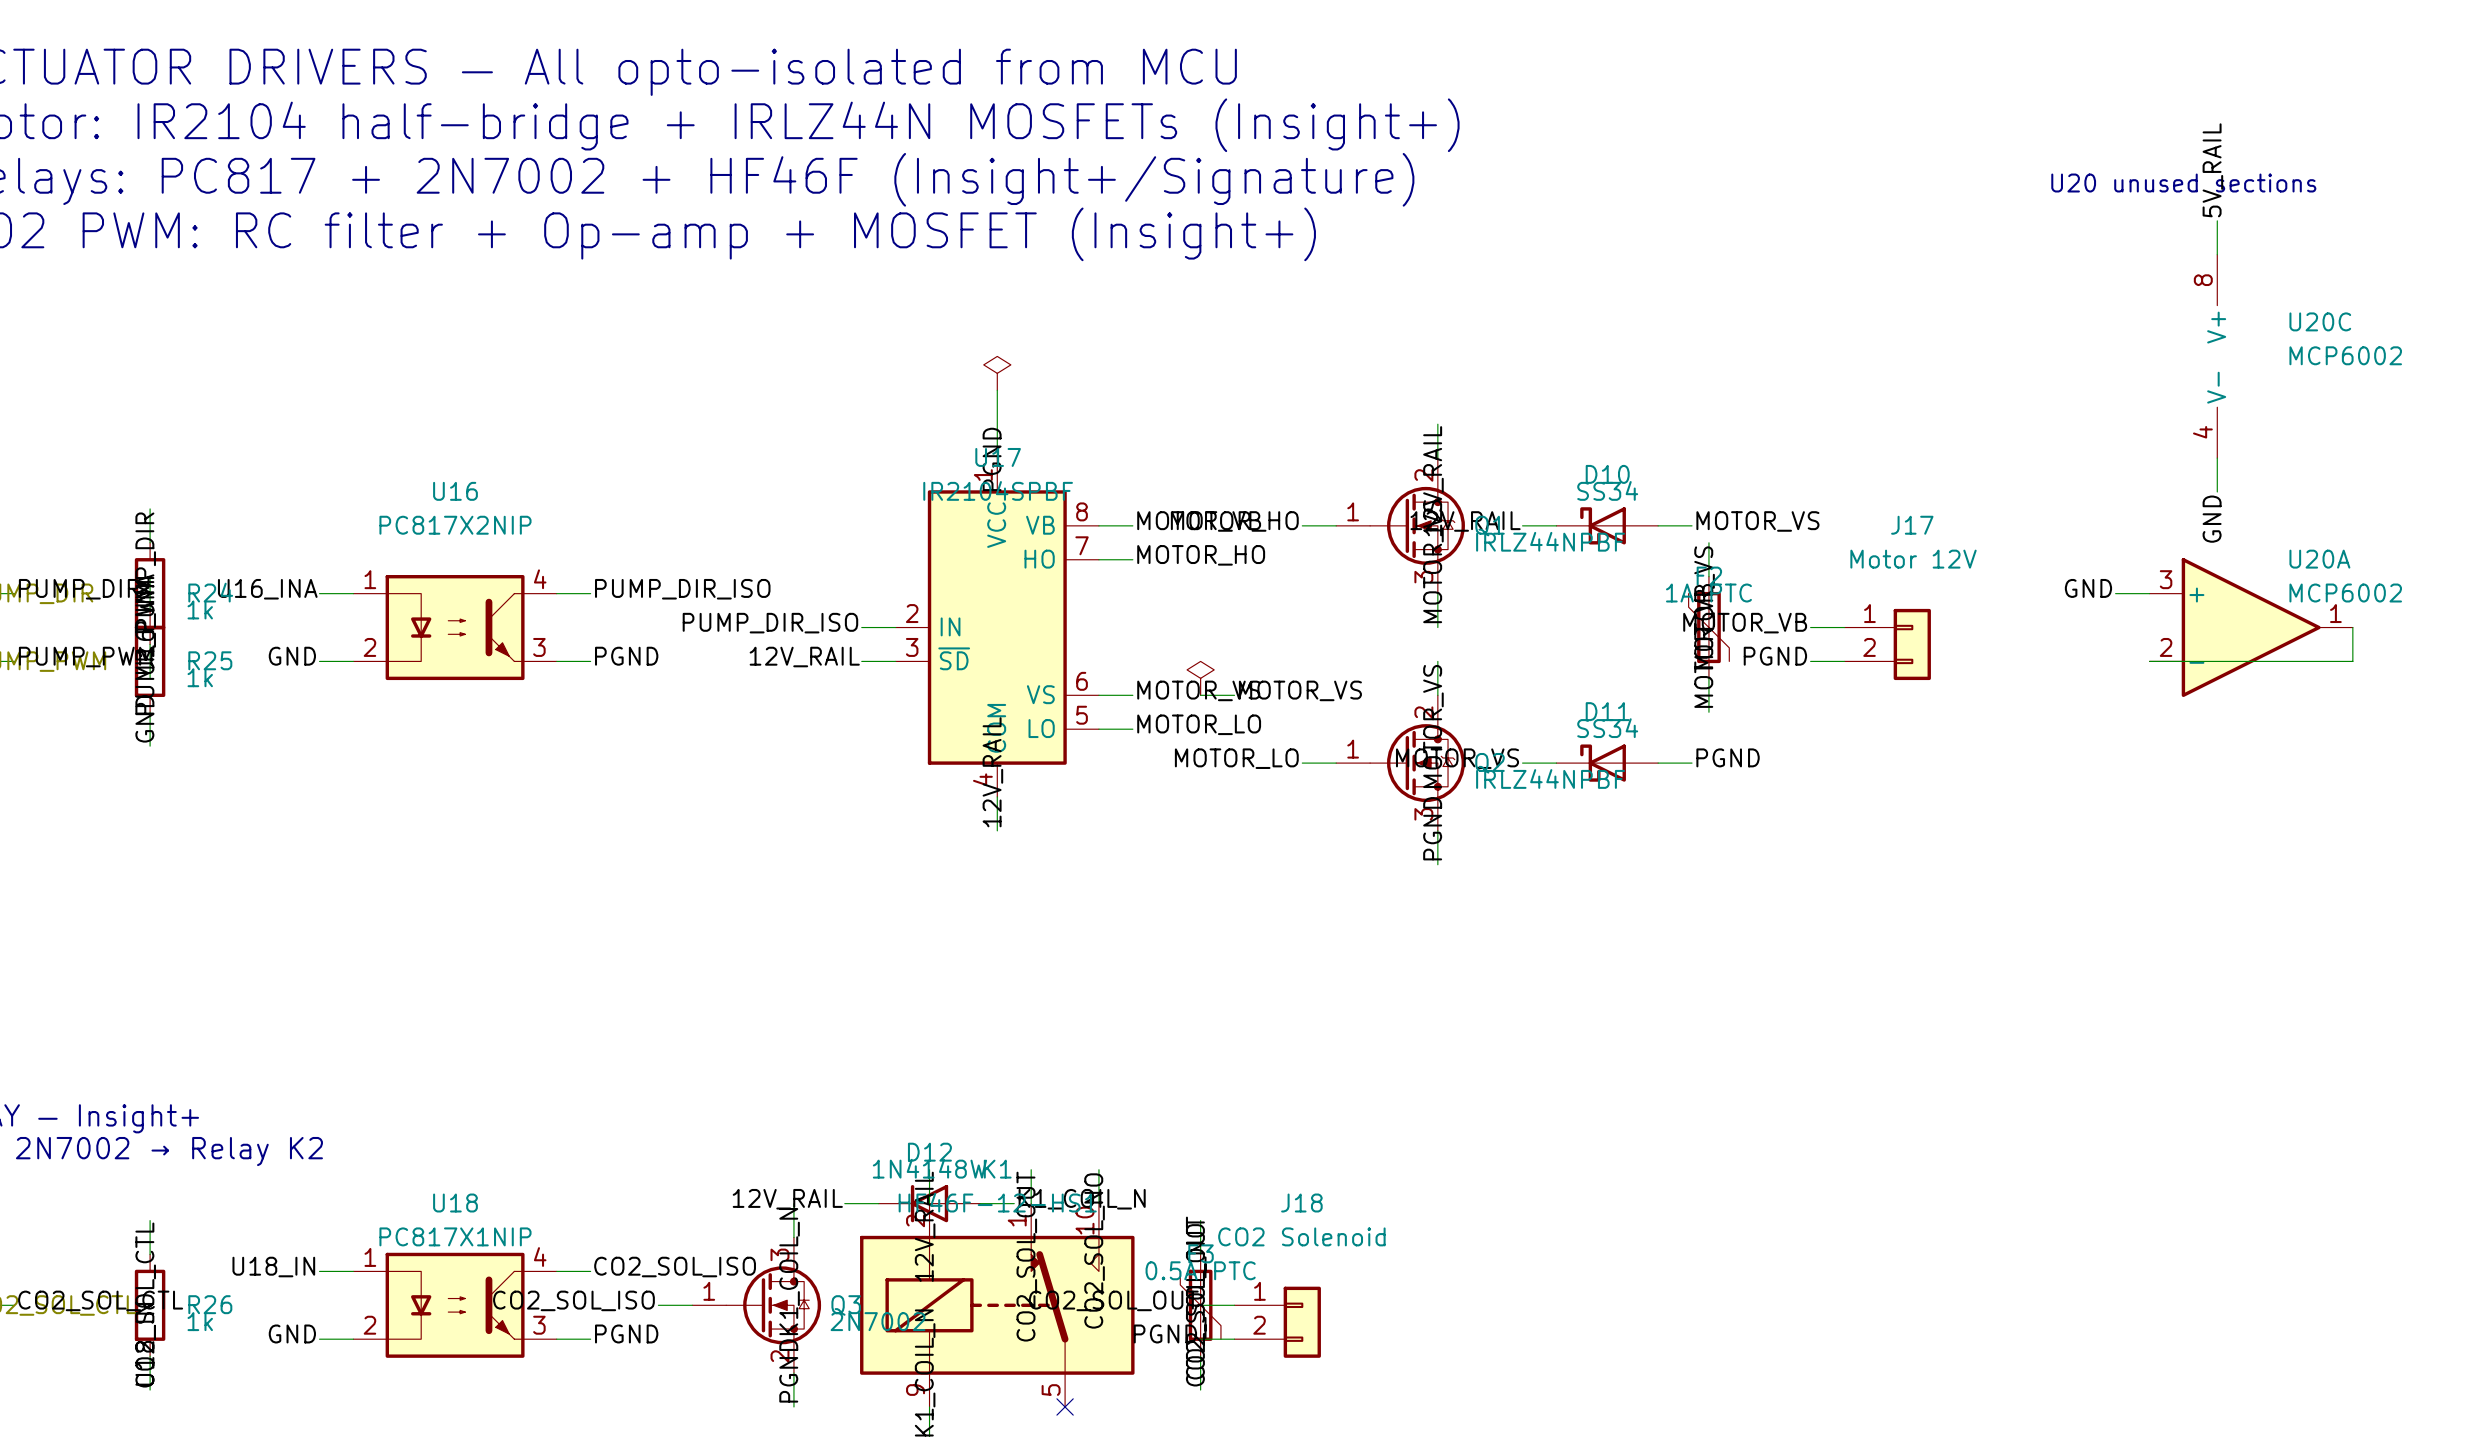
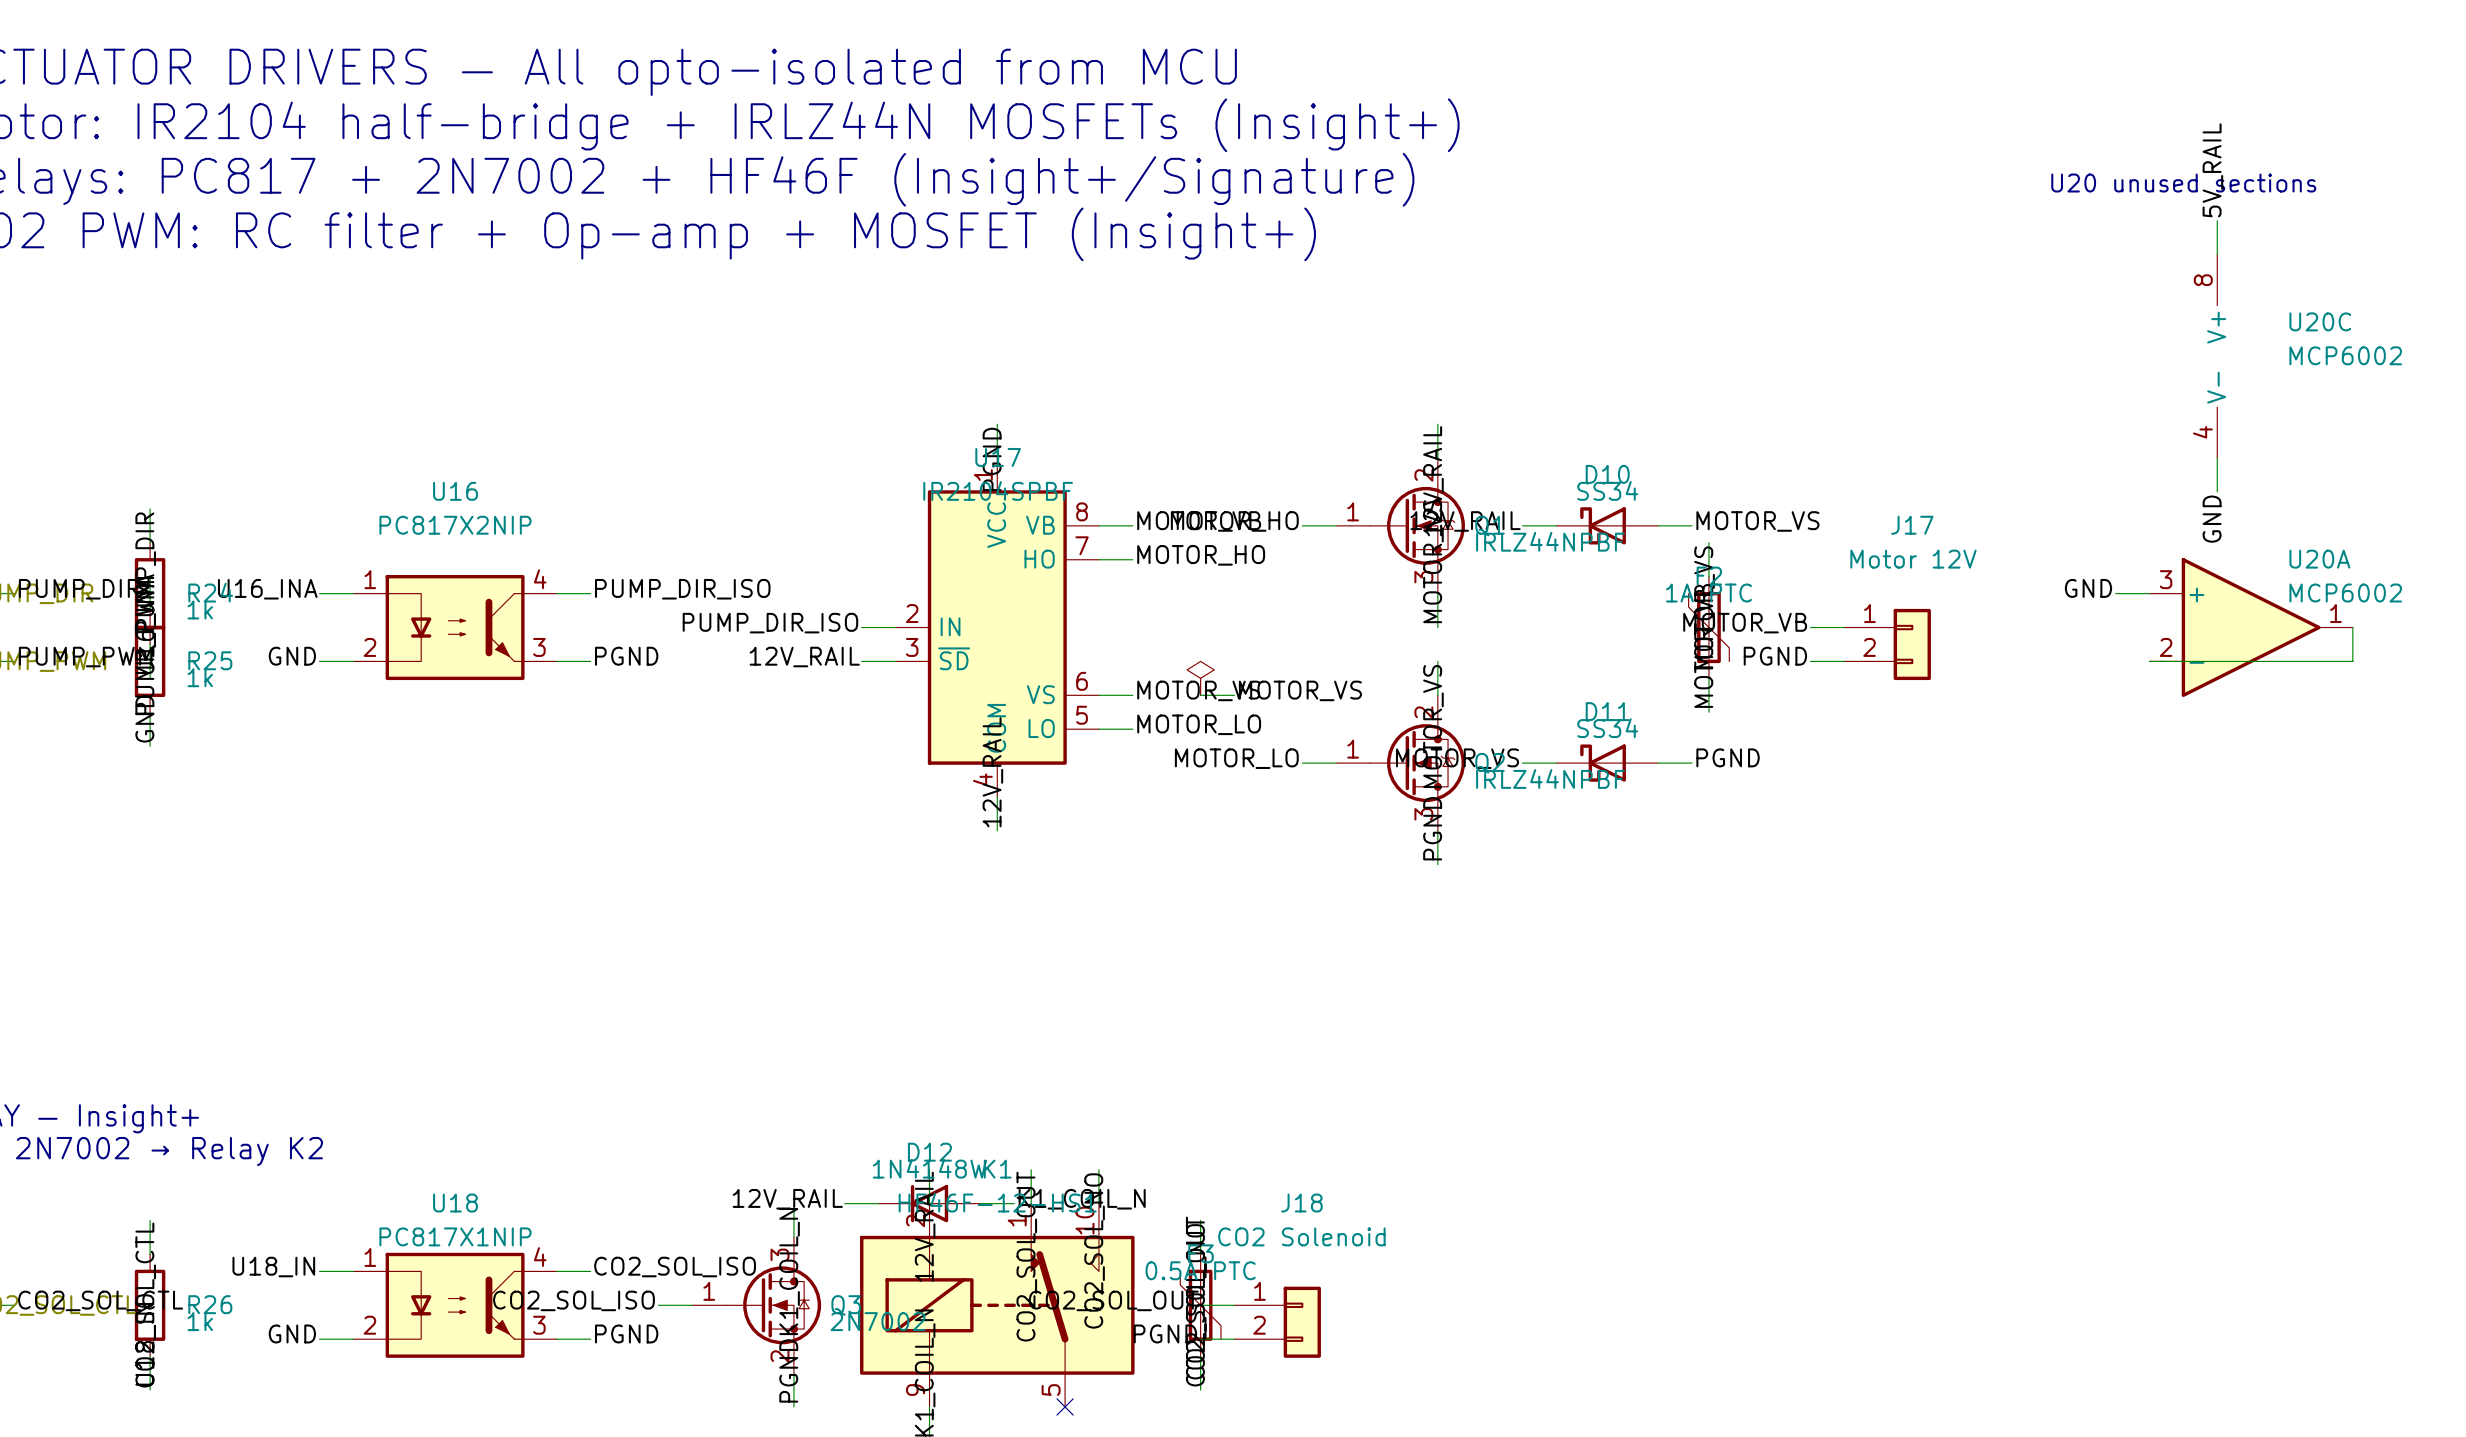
power symbol: (997, 373) -> none
wire: (997, 390) (997, 424) -> none

